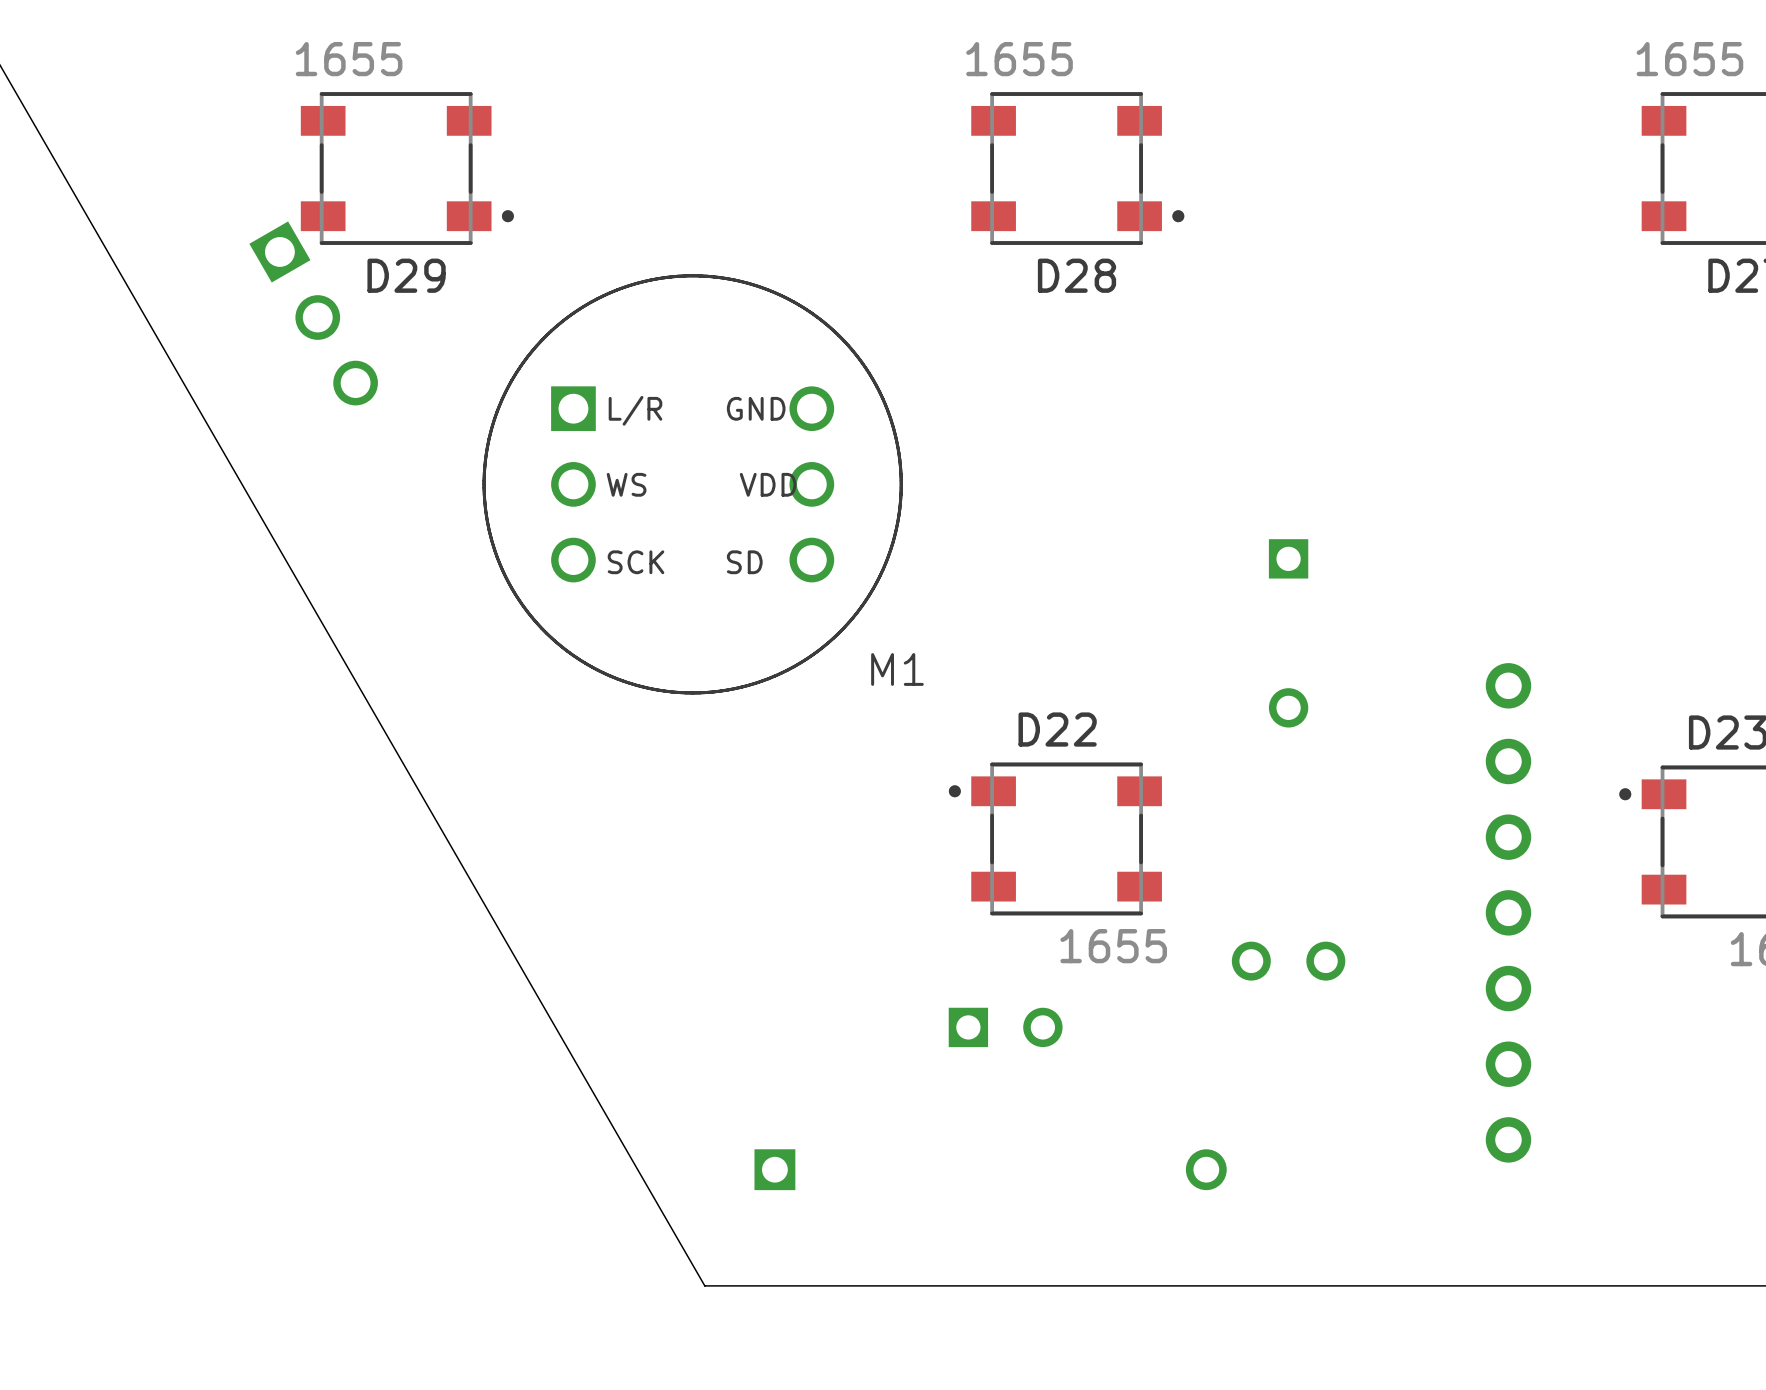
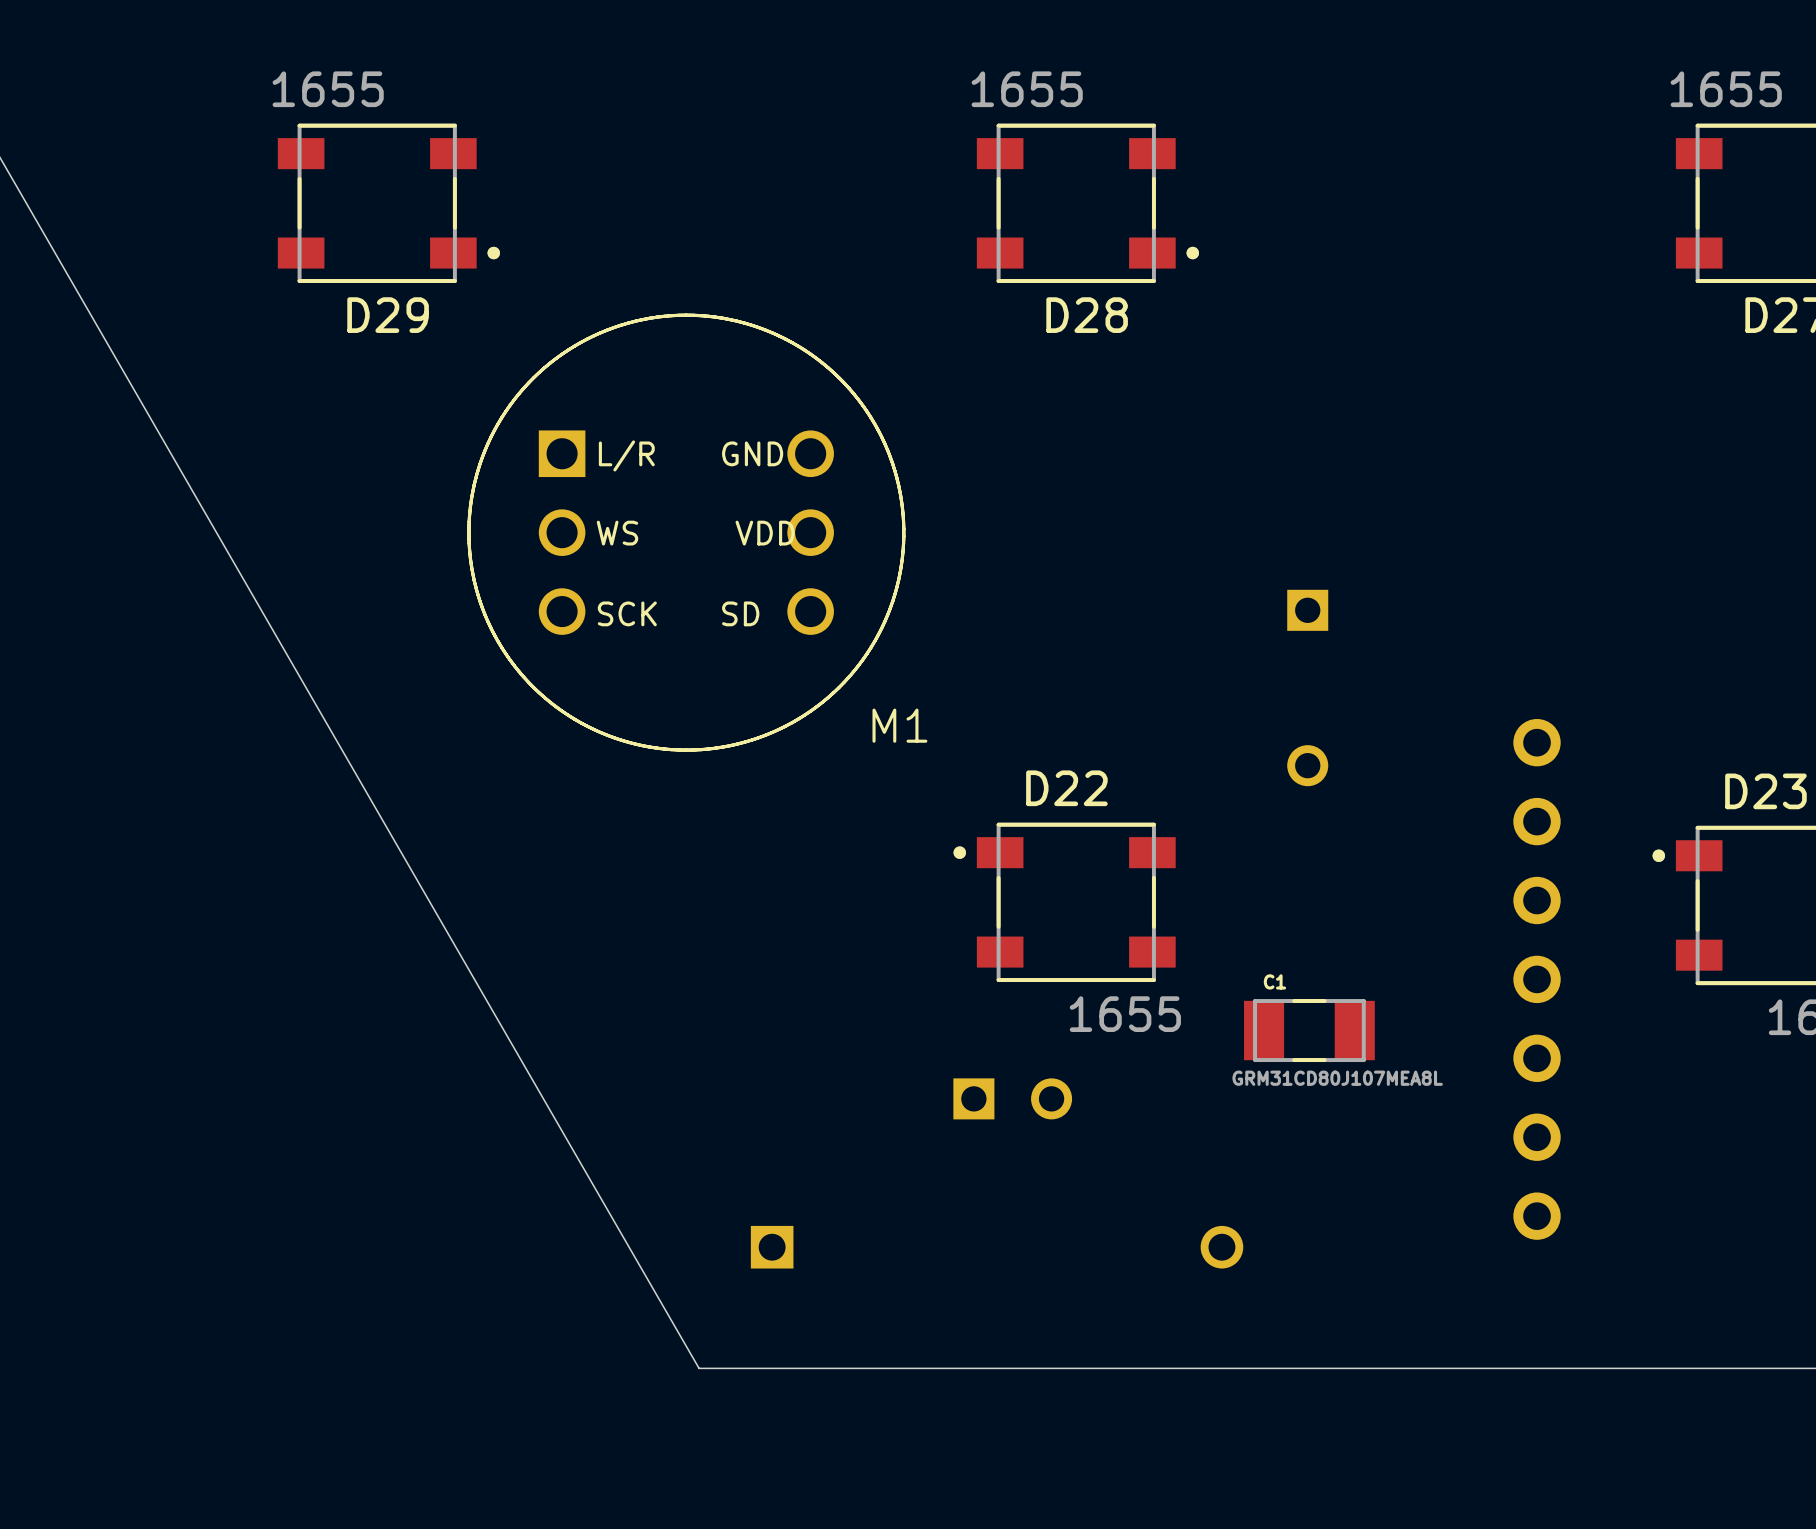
part: (313, 313) -> none
part: (1288, 961) -> none
C1: none -> GRM31CD80J107MEA8L (1309, 1030)

